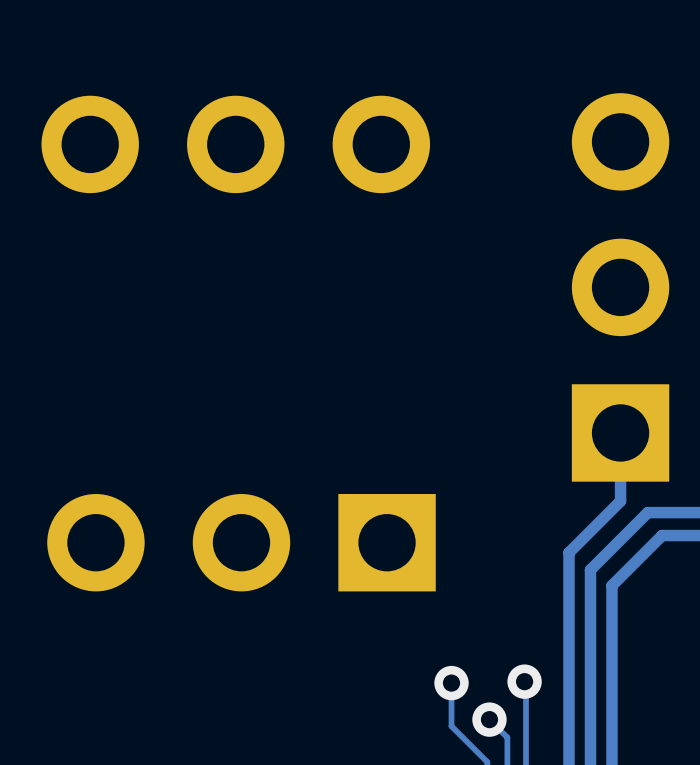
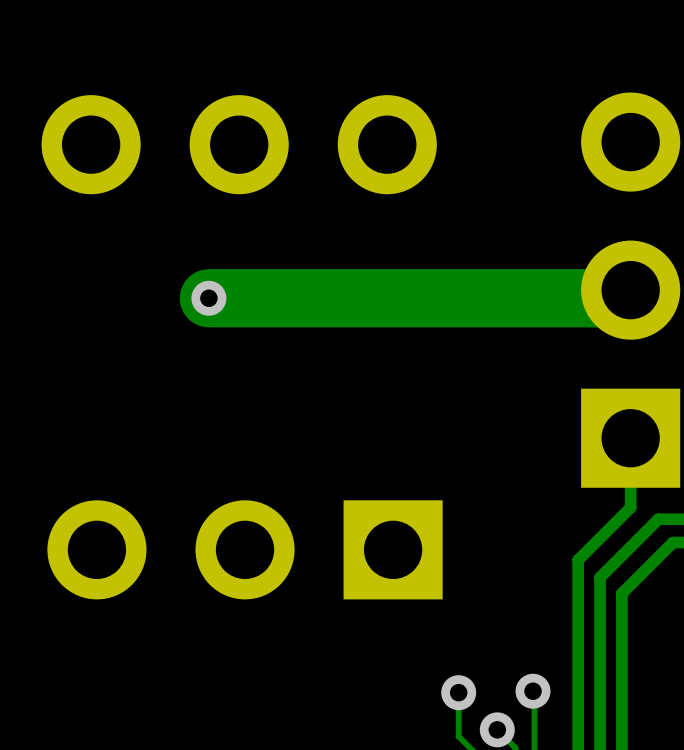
track: none -> (630, 290) (622, 298) (208, 298)
via: none -> (208, 298)

